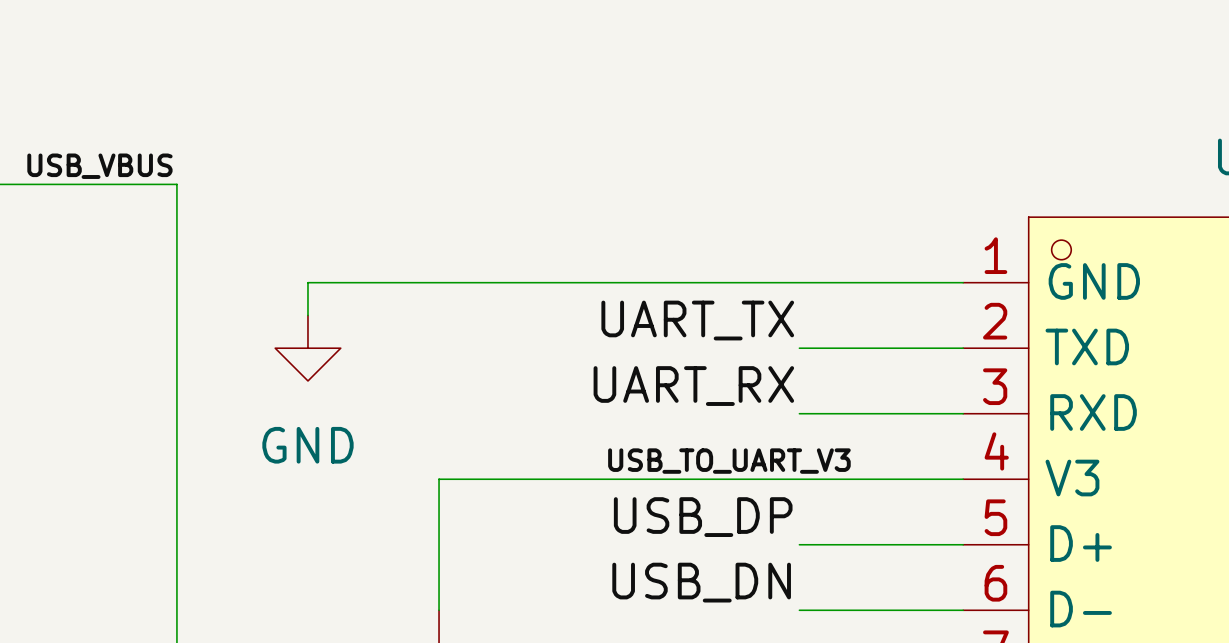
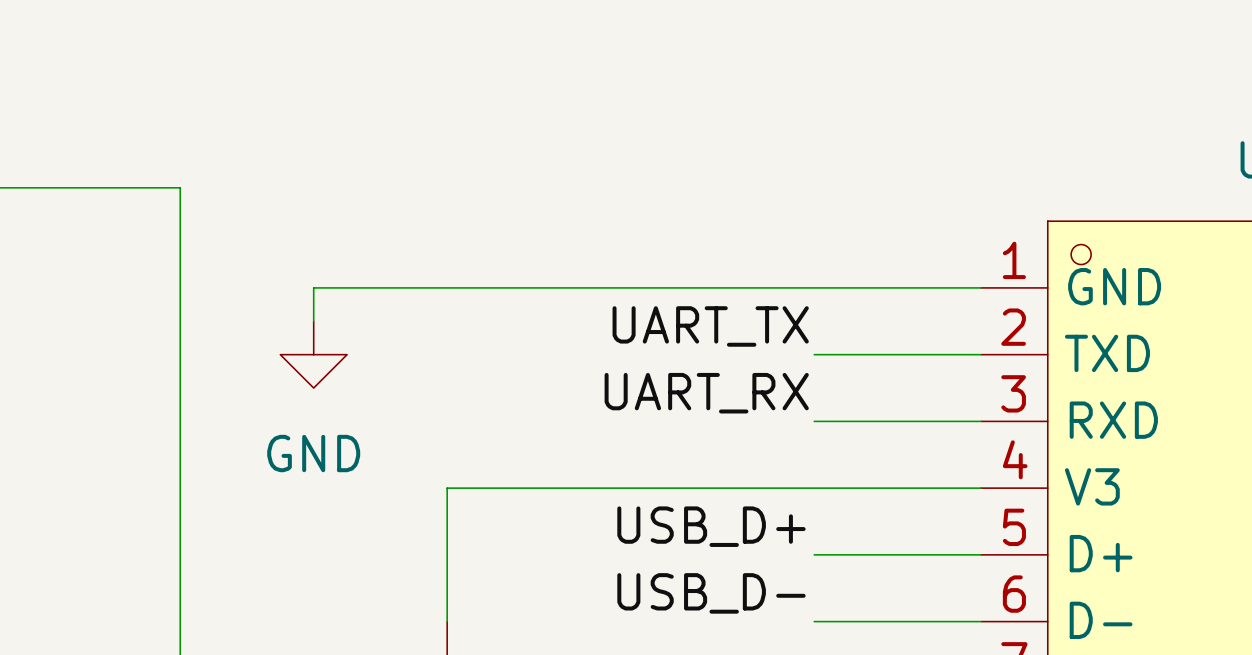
label: USB_VBUS (99, 166) -> none
label: USB_TO_UART_V3 (729, 461) -> none
label: USB_DP (703, 517) -> USB_D+ (711, 526)
label: USB_DN (701, 582) -> USB_D- (711, 593)

